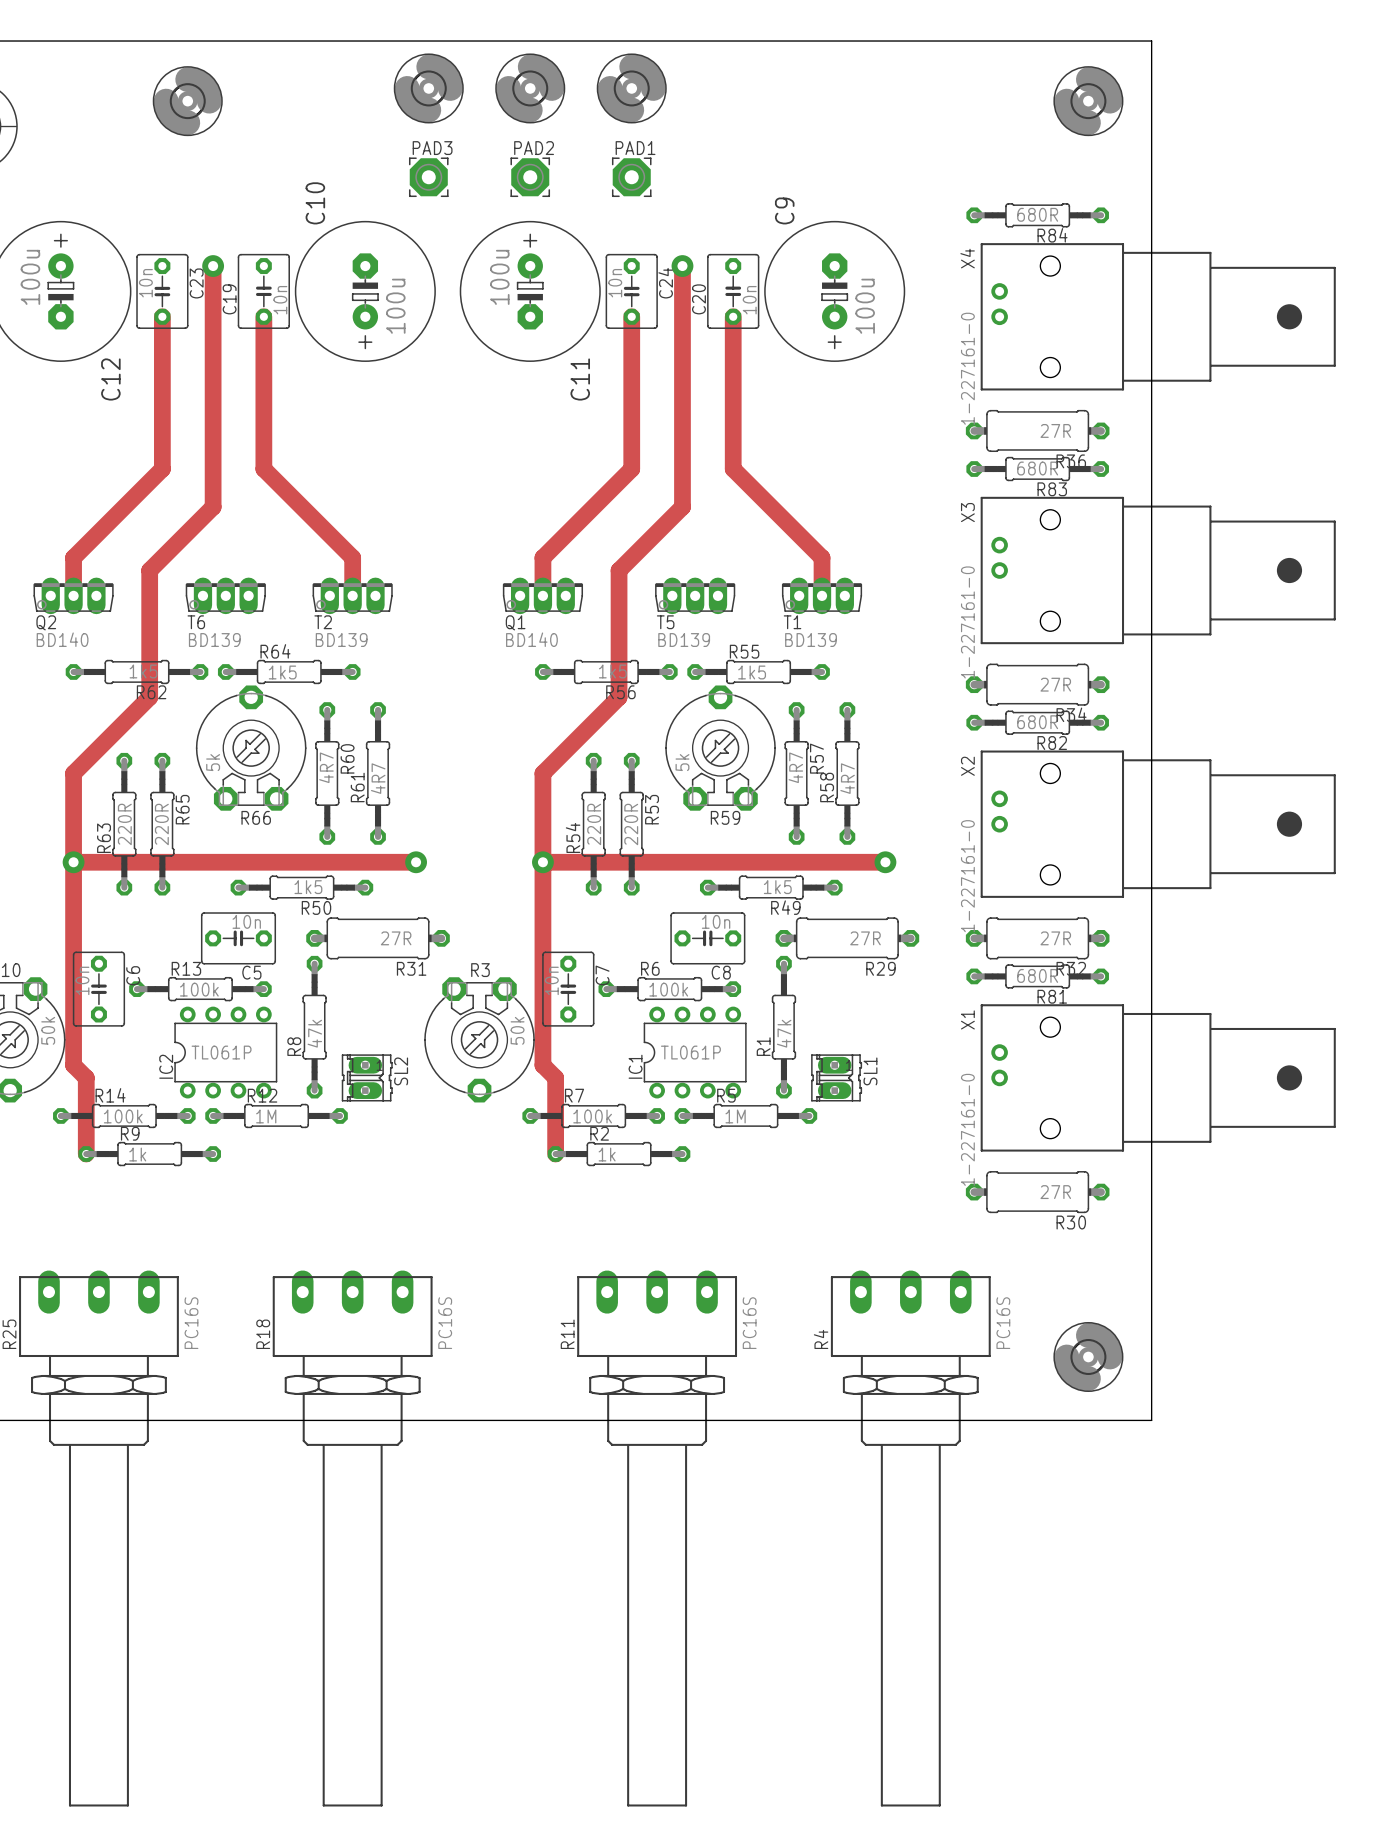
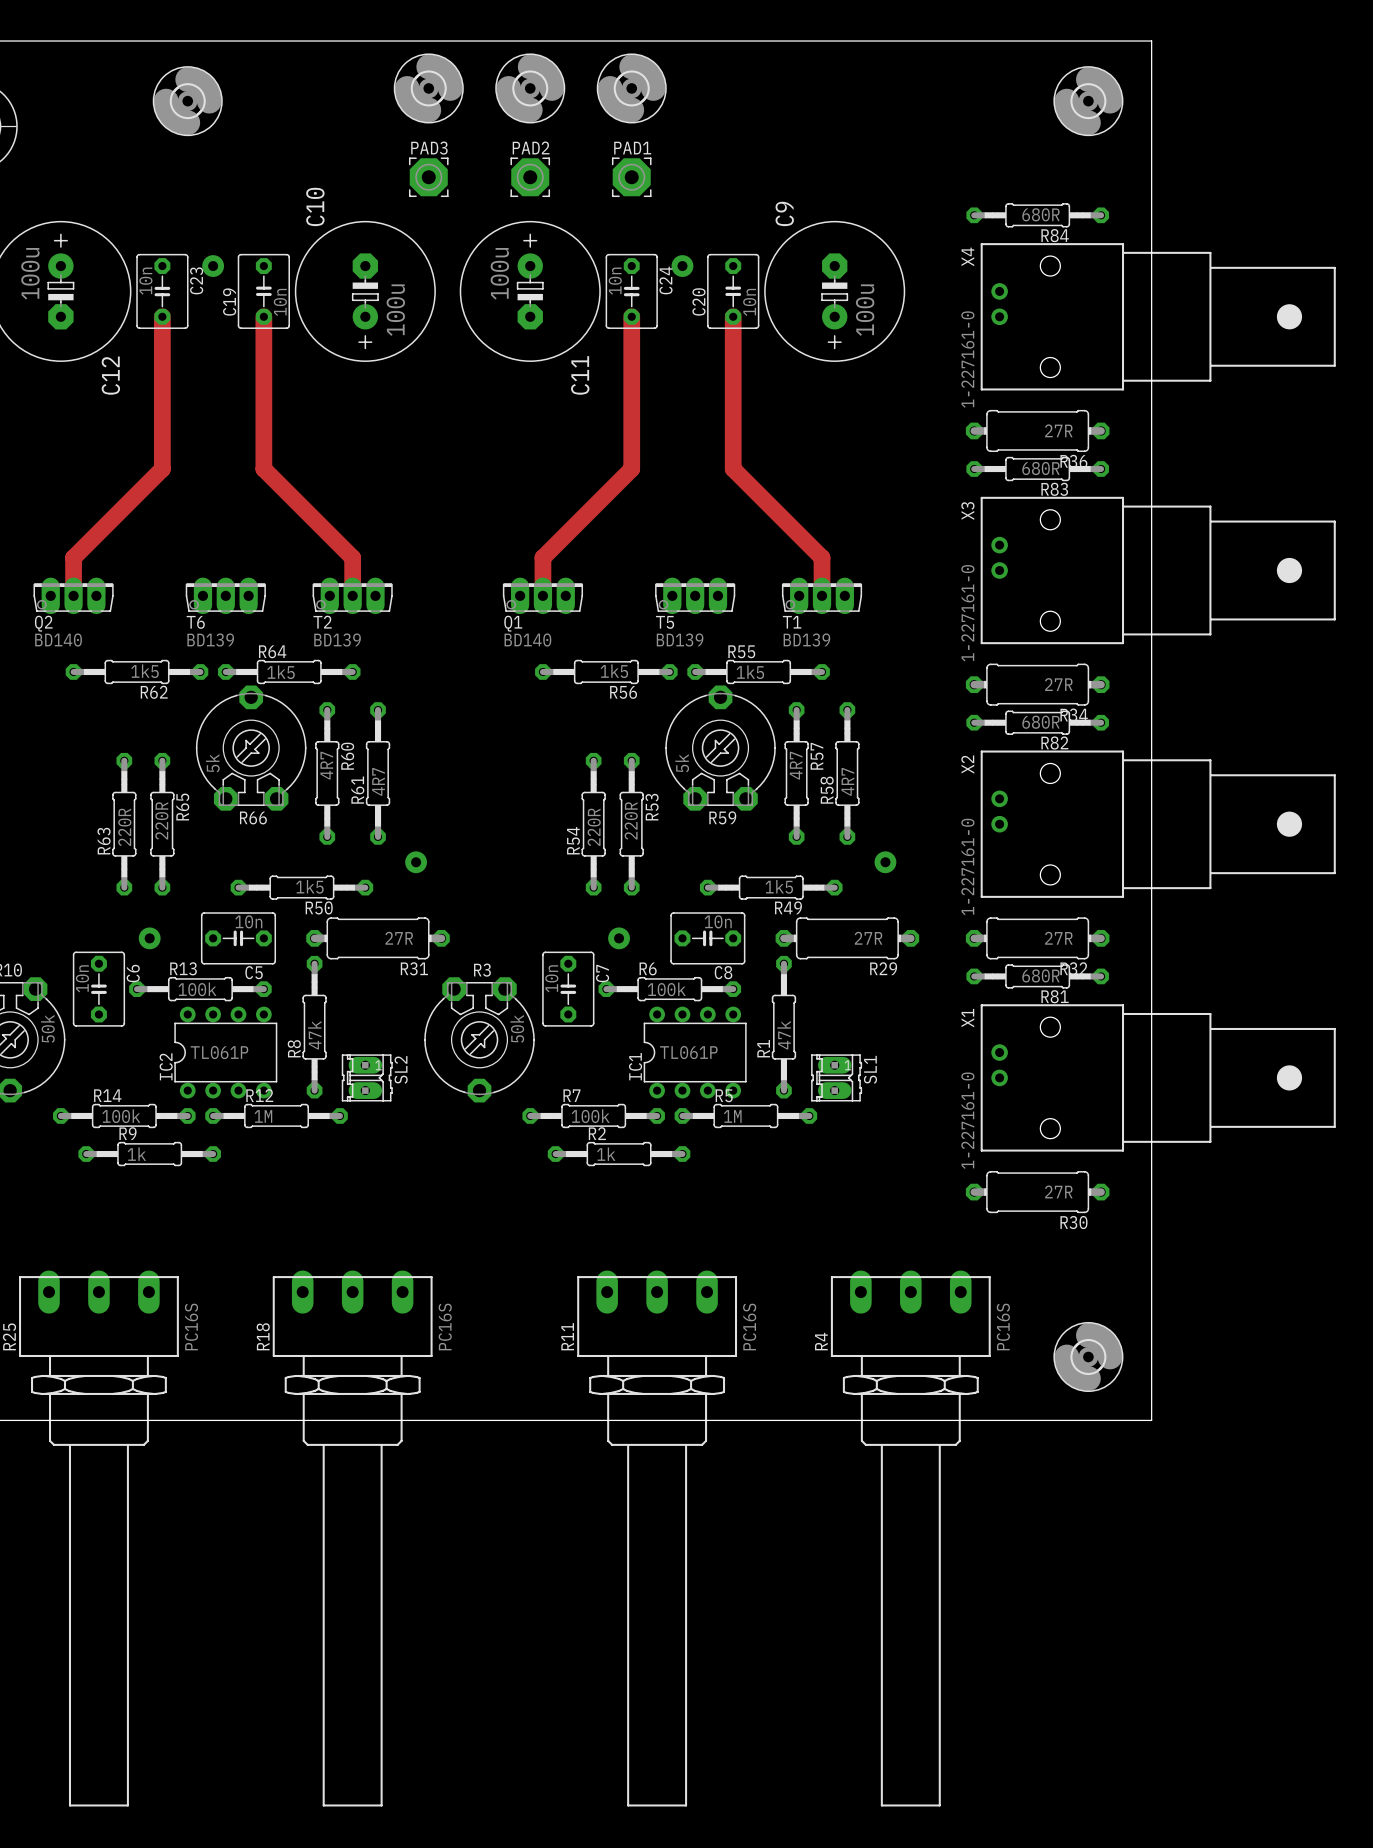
track: (213, 266) (213, 507) (149, 570) (149, 697) (73, 773) (73, 1065) (86, 1077) (86, 1154) -> none
track: (682, 266) (682, 507) (619, 570) (619, 697) (542, 773) (542, 1065) (555, 1077) (555, 1154) -> none
track: (73, 862) (416, 862) -> none
via: (73, 862) -> none
track: (542, 862) (885, 862) -> none
via: (542, 862) -> none
via: none -> (149, 938)
via: none -> (619, 938)

